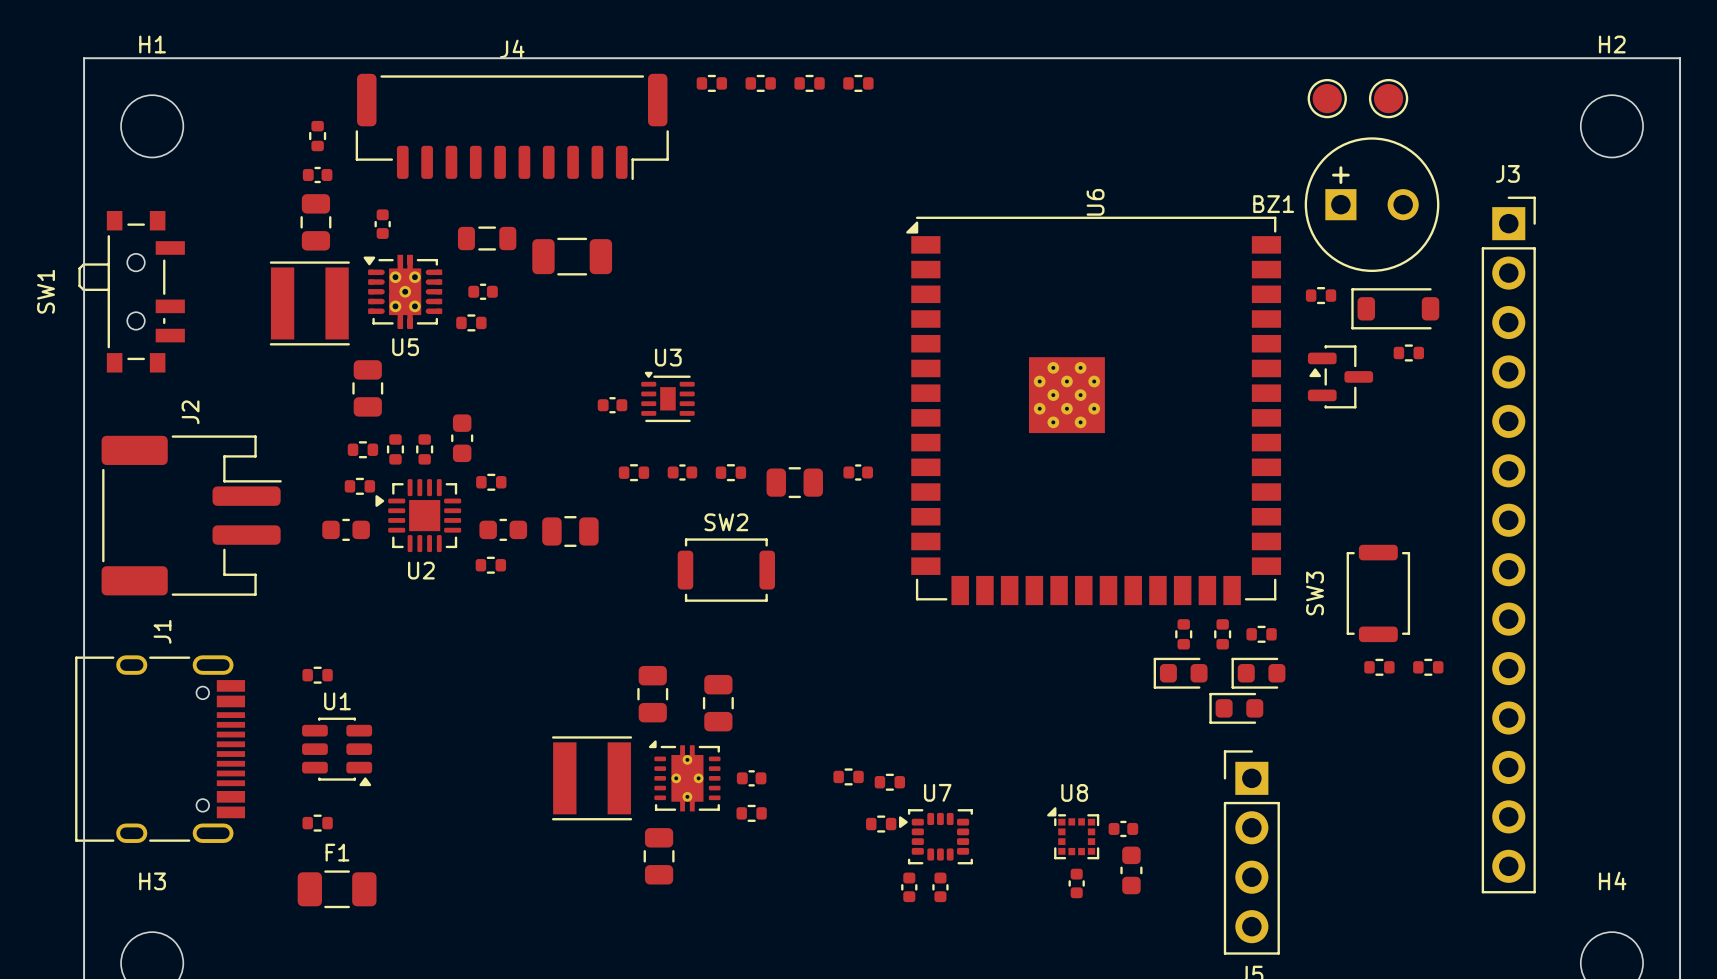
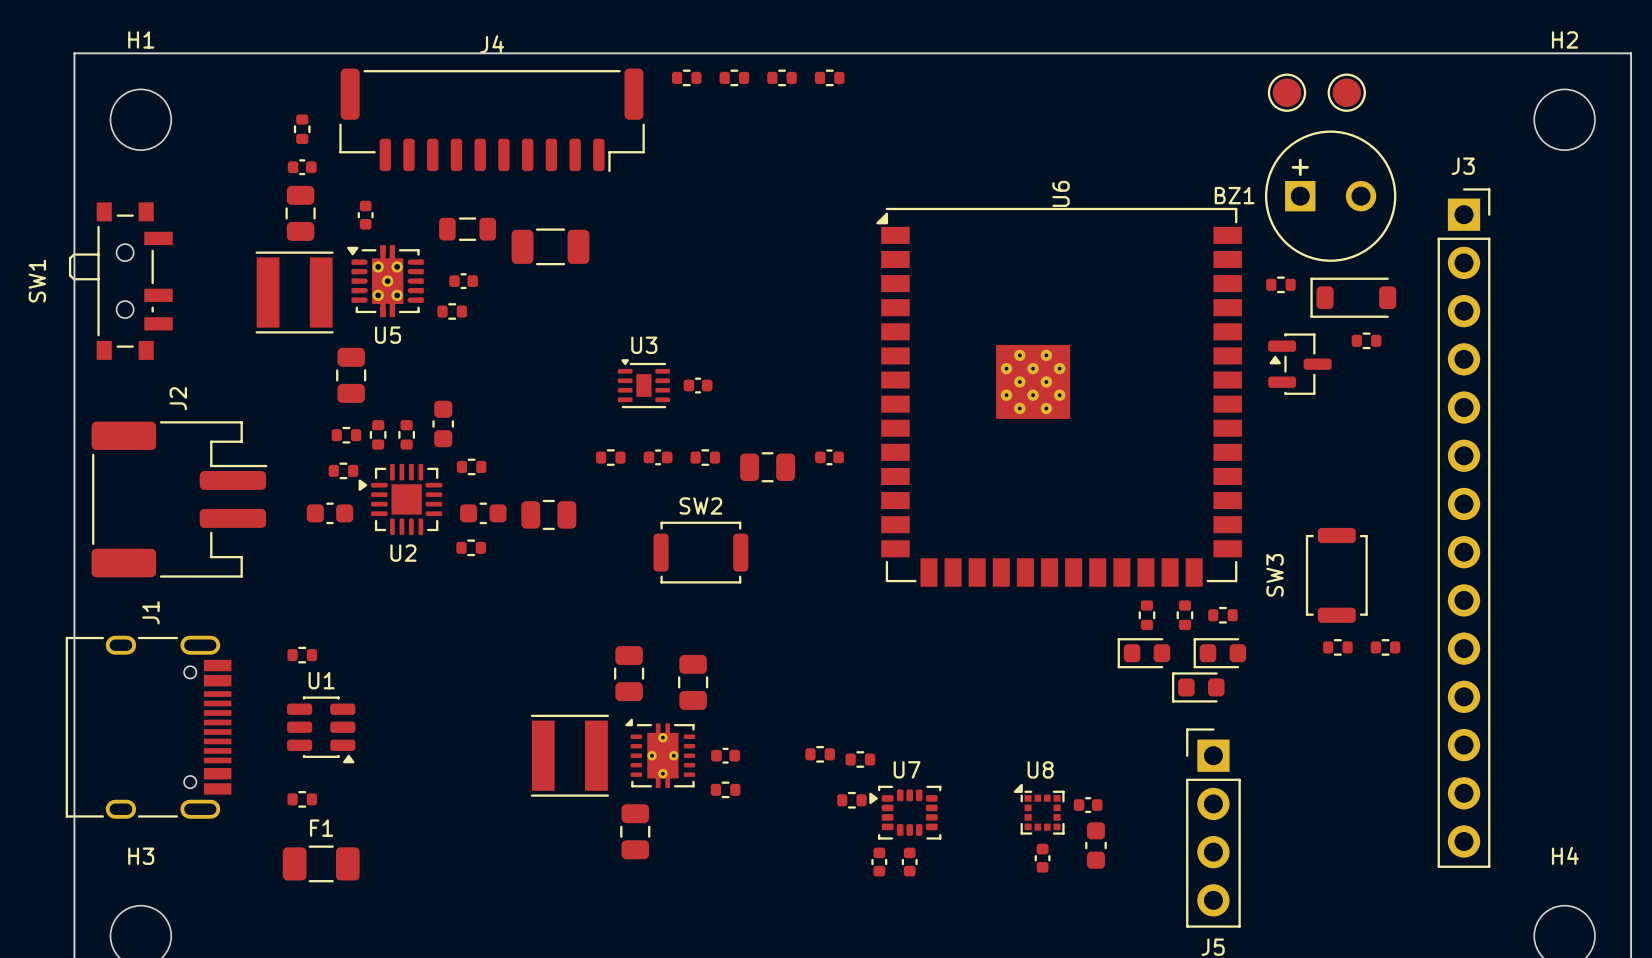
part position: (612, 405) -> (698, 385)

